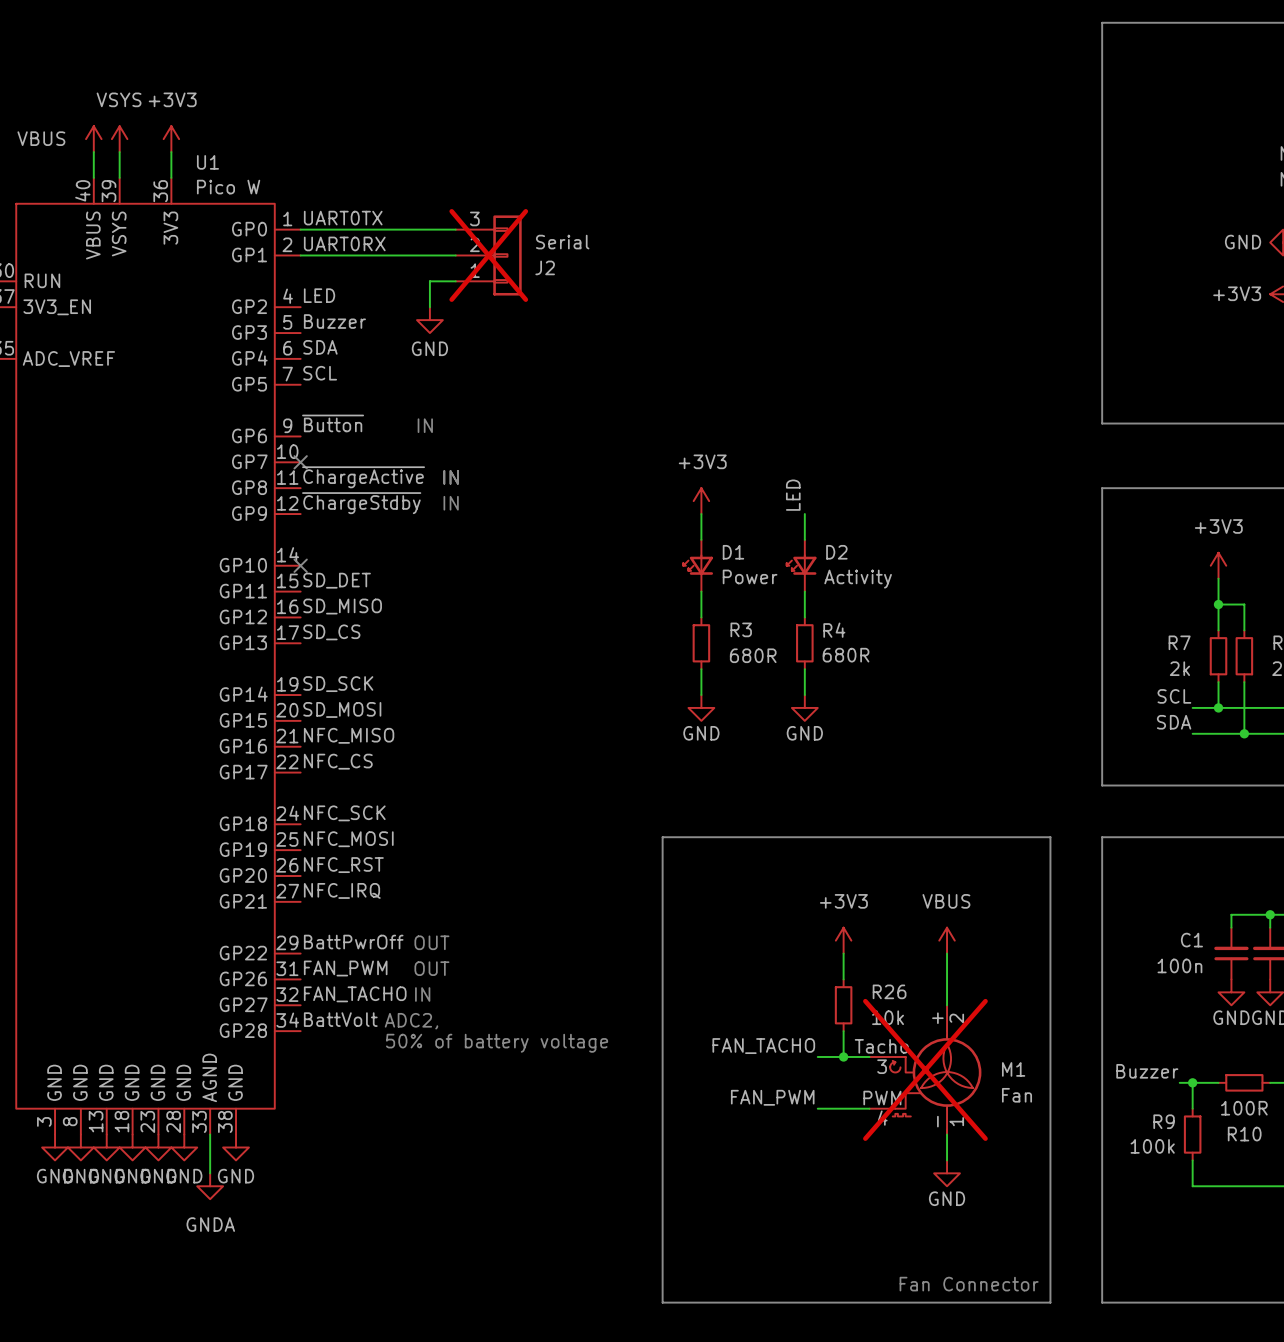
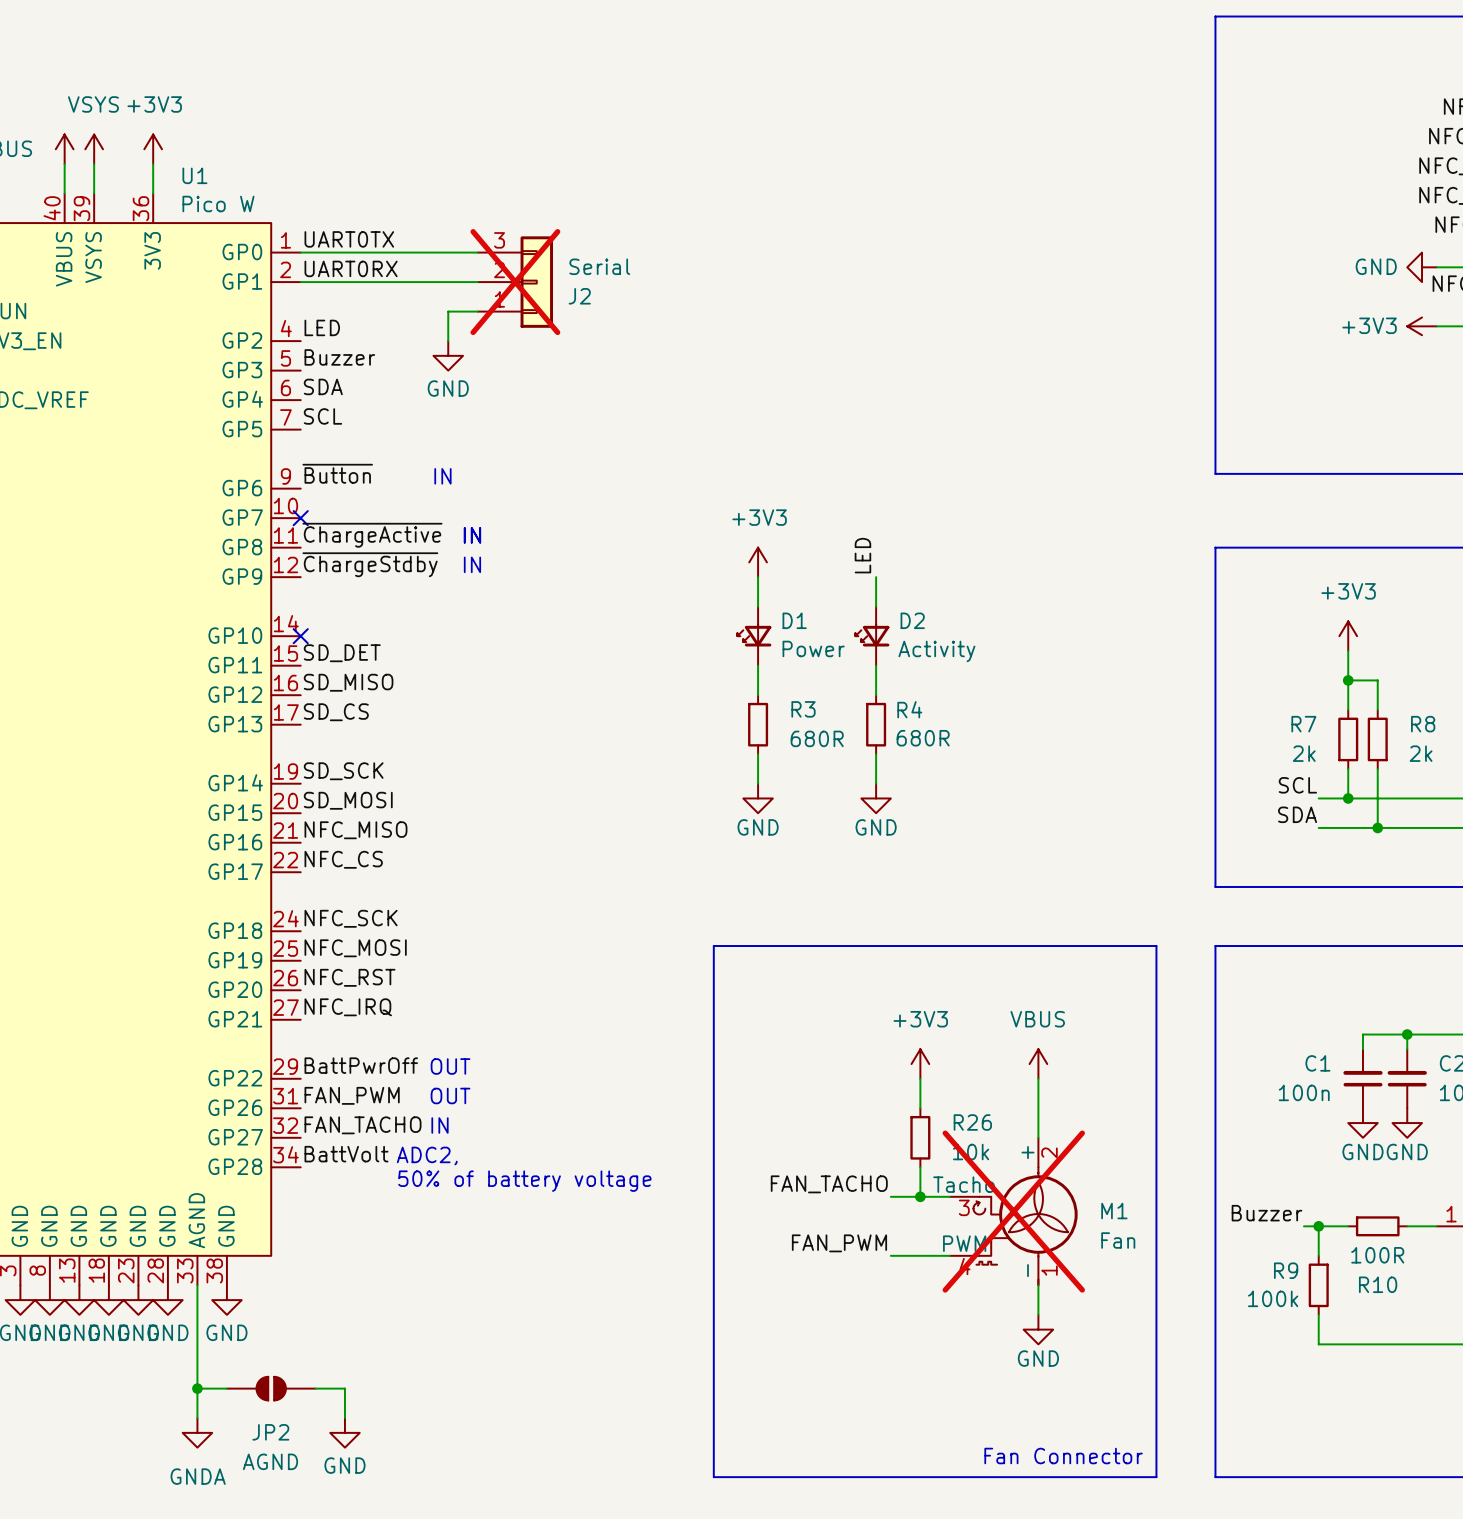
wire: none -> (197, 1329) (197, 1418)
power symbol position: GNDA (210, 1186) -> GNDA (197, 1432)
wire: none -> (197, 1388) (226, 1388)
junction: none -> (197, 1388)
JP2: none -> AGND (271, 1388)
wire: none -> (315, 1388) (344, 1388) (344, 1418)
power symbol: none -> GND (344, 1432)

